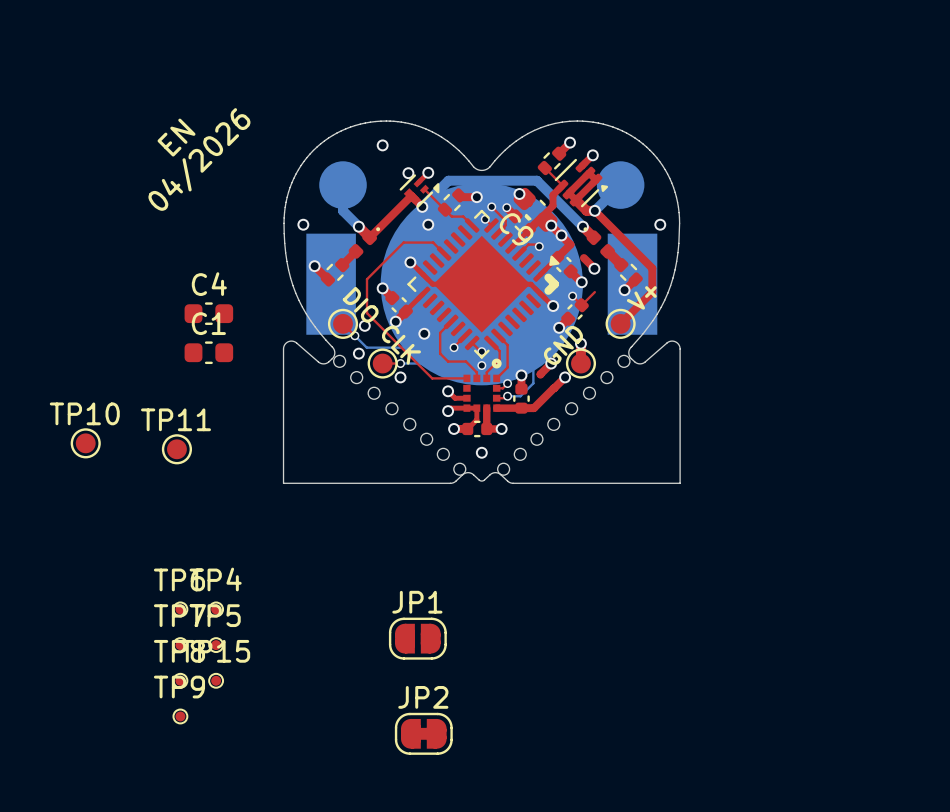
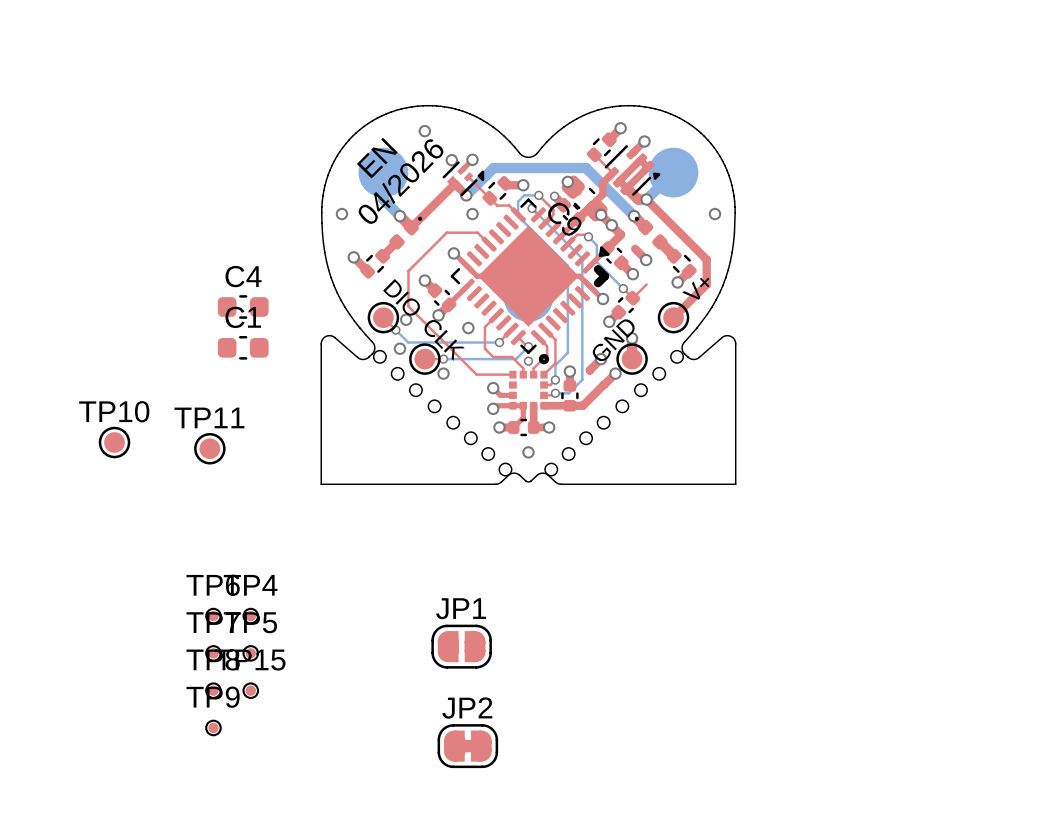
text position: EN (176, 137) -> EN (377, 158)
text position: 04/2026 (199, 159) -> 04/2026 (400, 181)
part: (481, 284) -> none

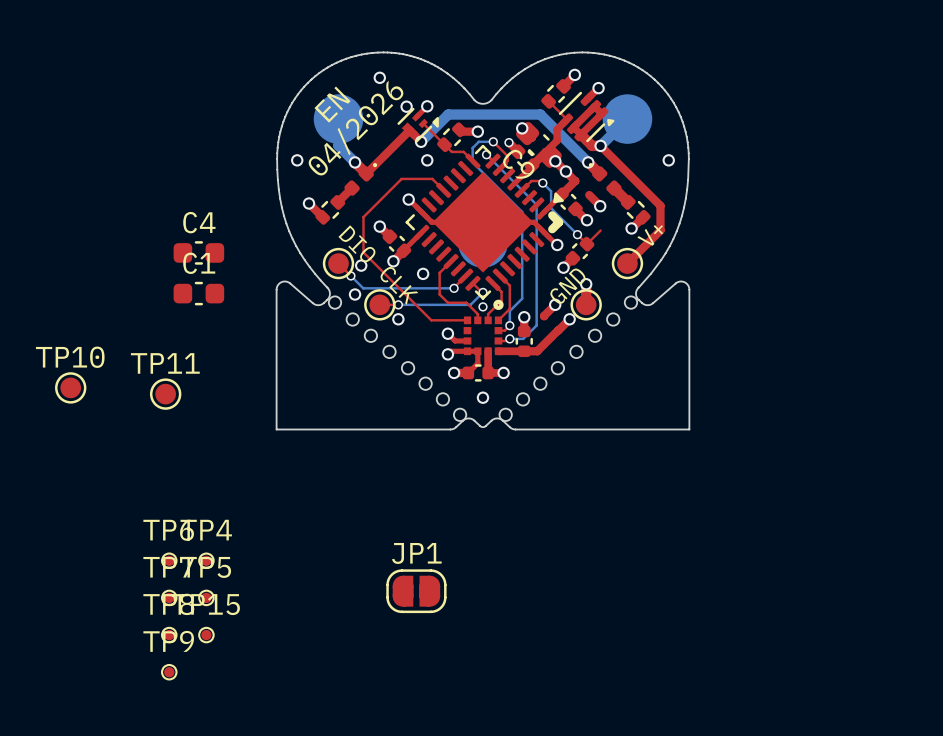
JP2: (467, 746) -> none

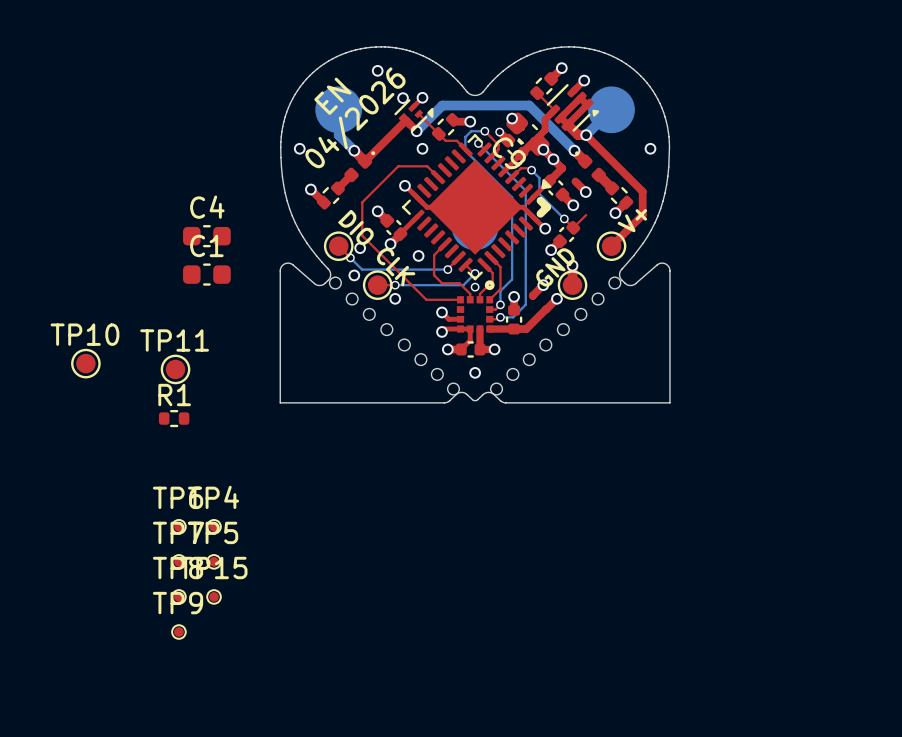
R1: none -> (174, 418)
JP1: (416, 591) -> none

